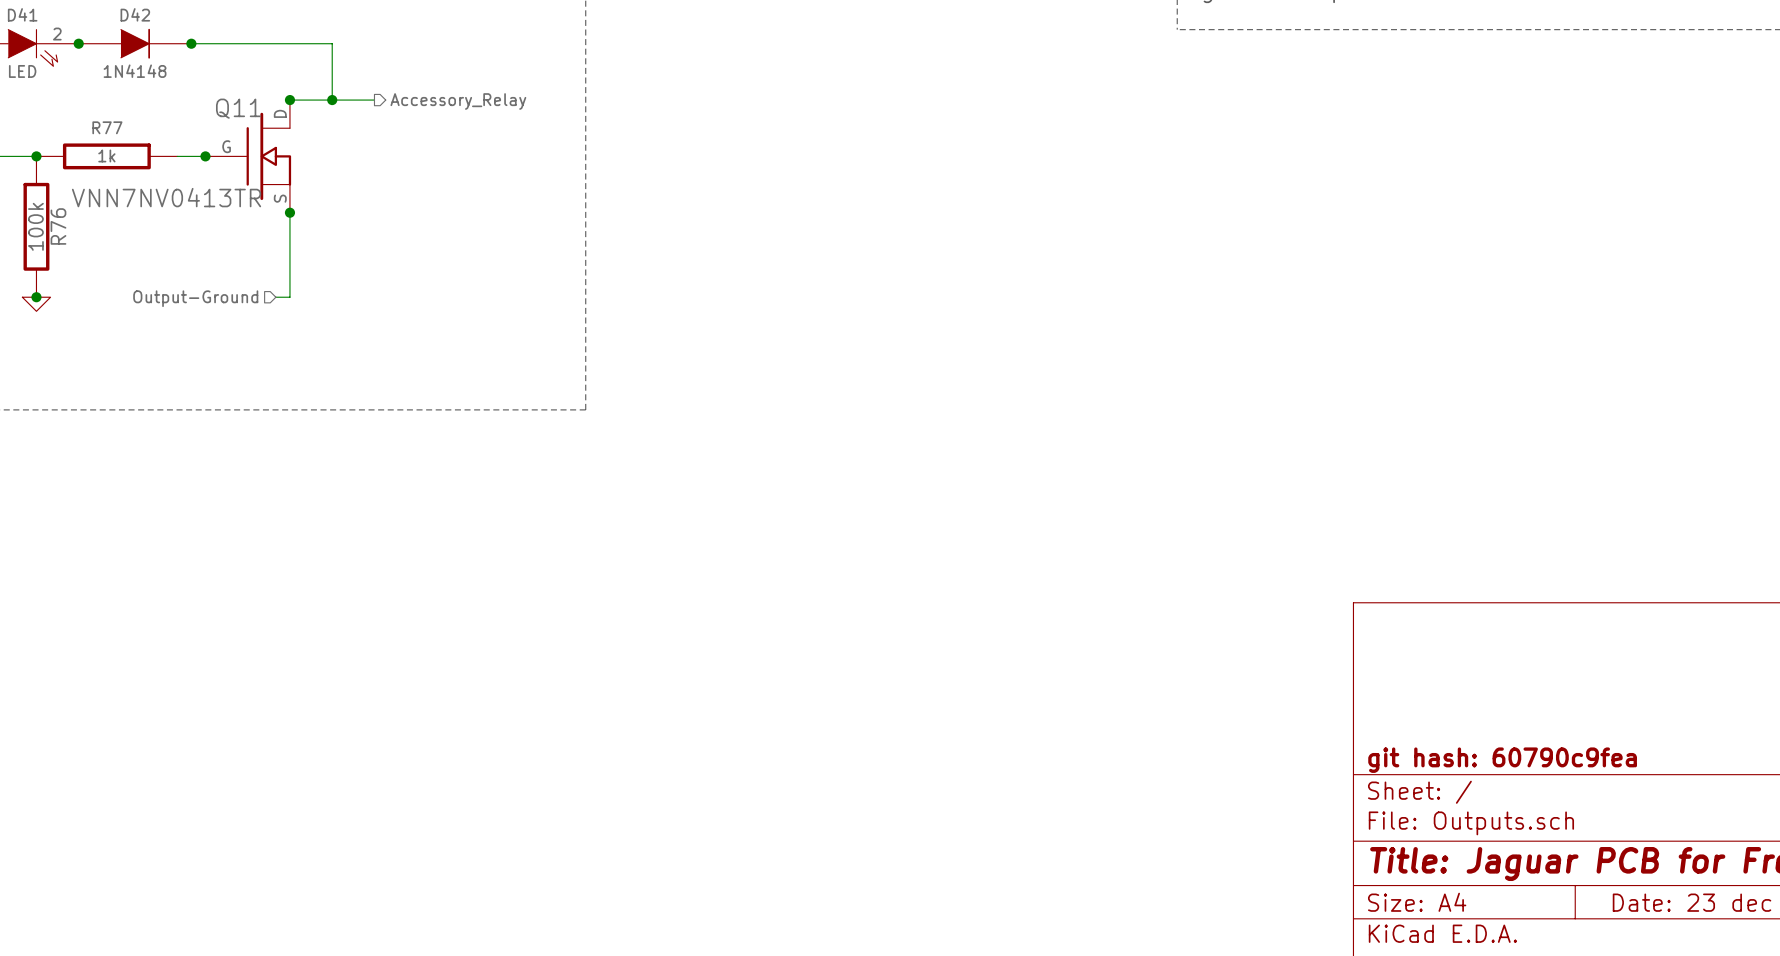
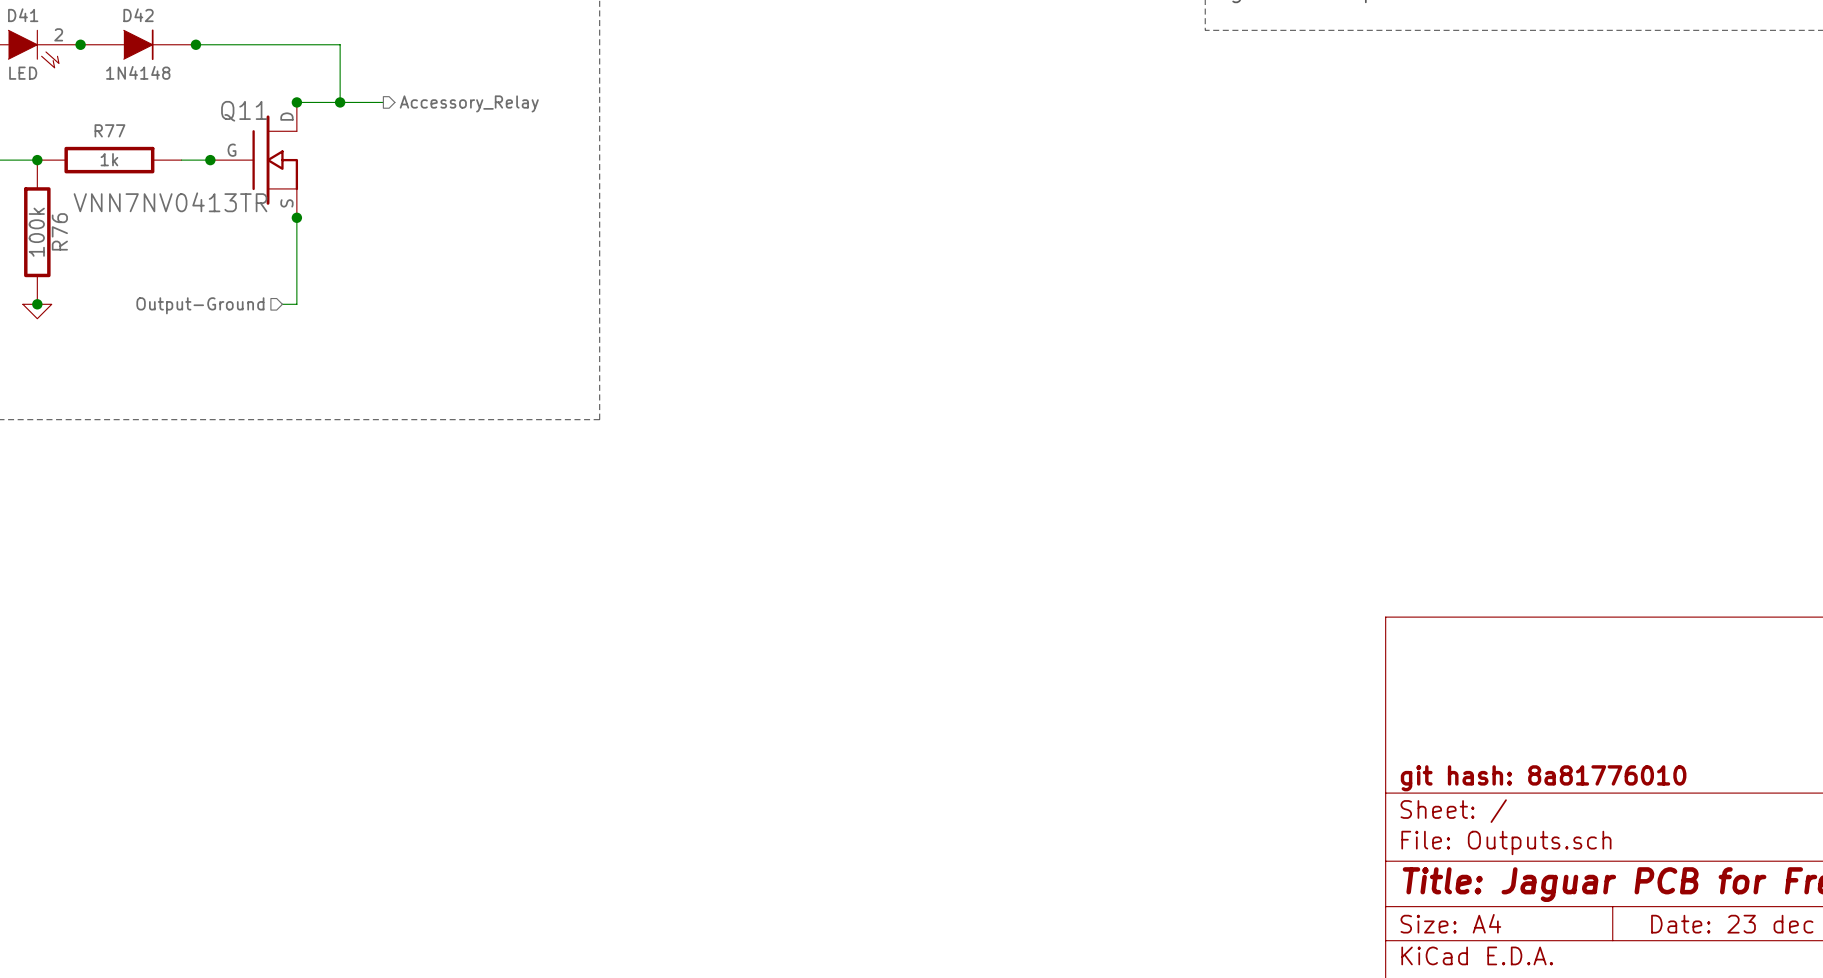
title block: git hash: 60790c9fea (1502, 760) -> git hash: 8a81776010 (1543, 778)

